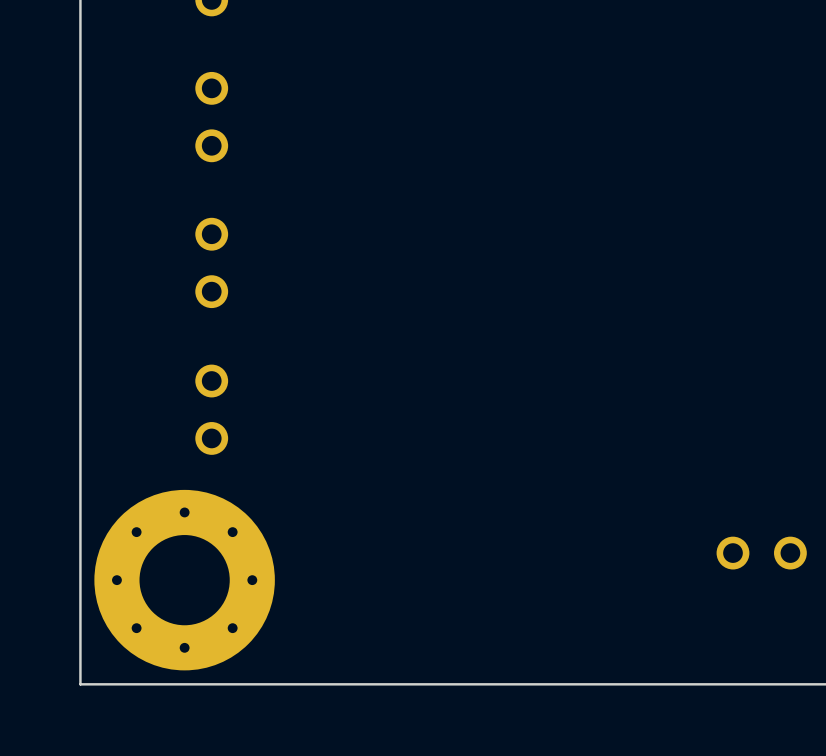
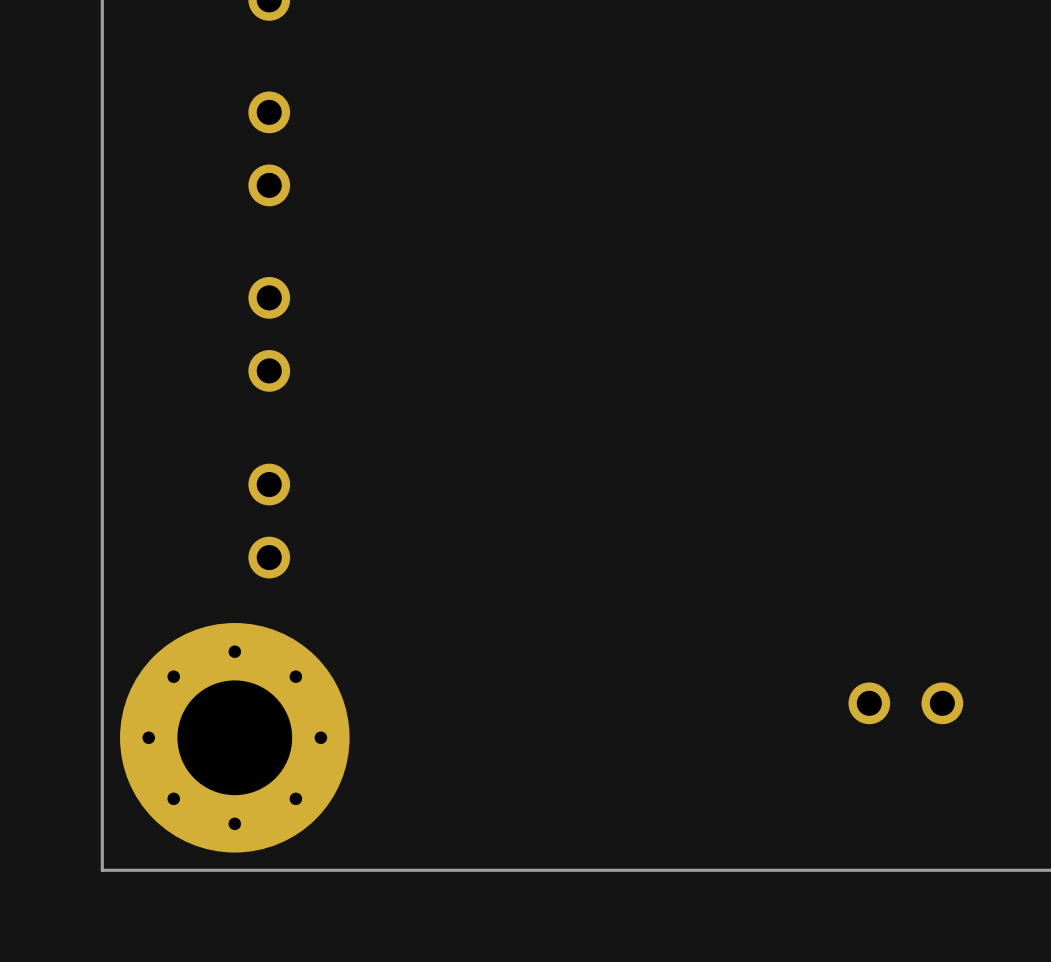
part position: (761, 553) -> (905, 703)

